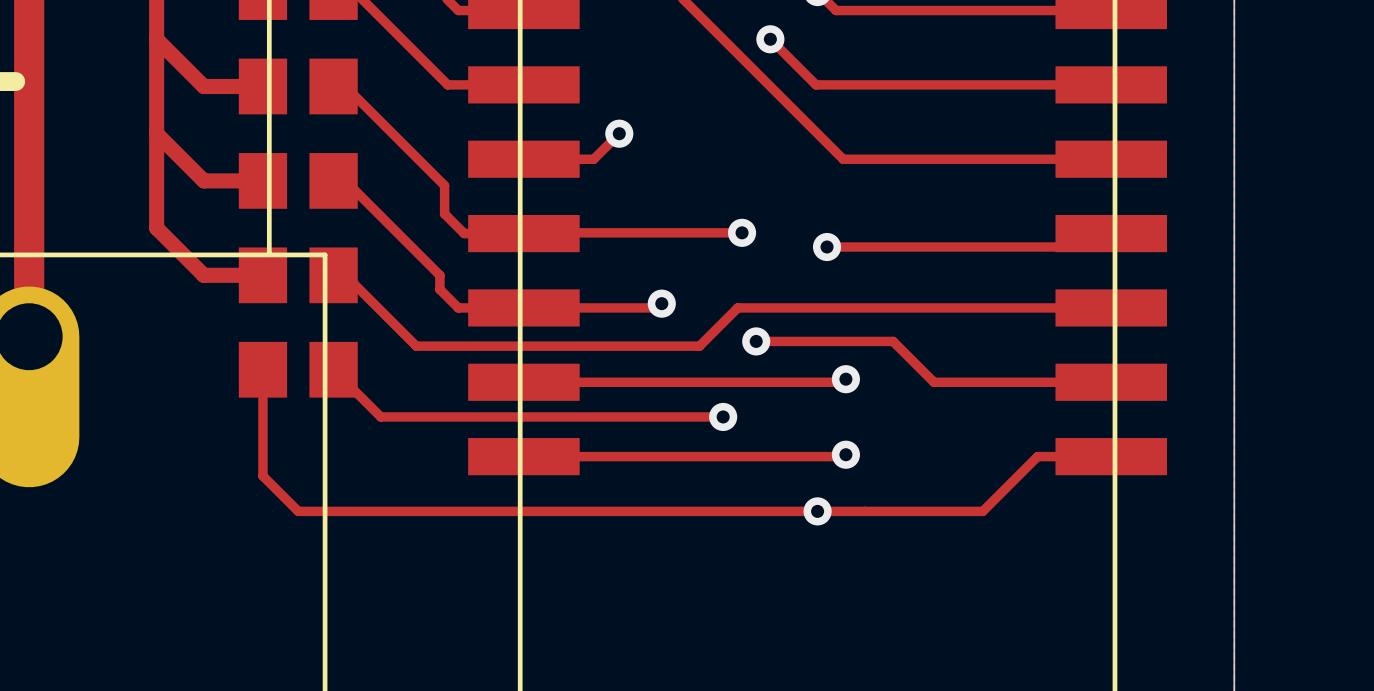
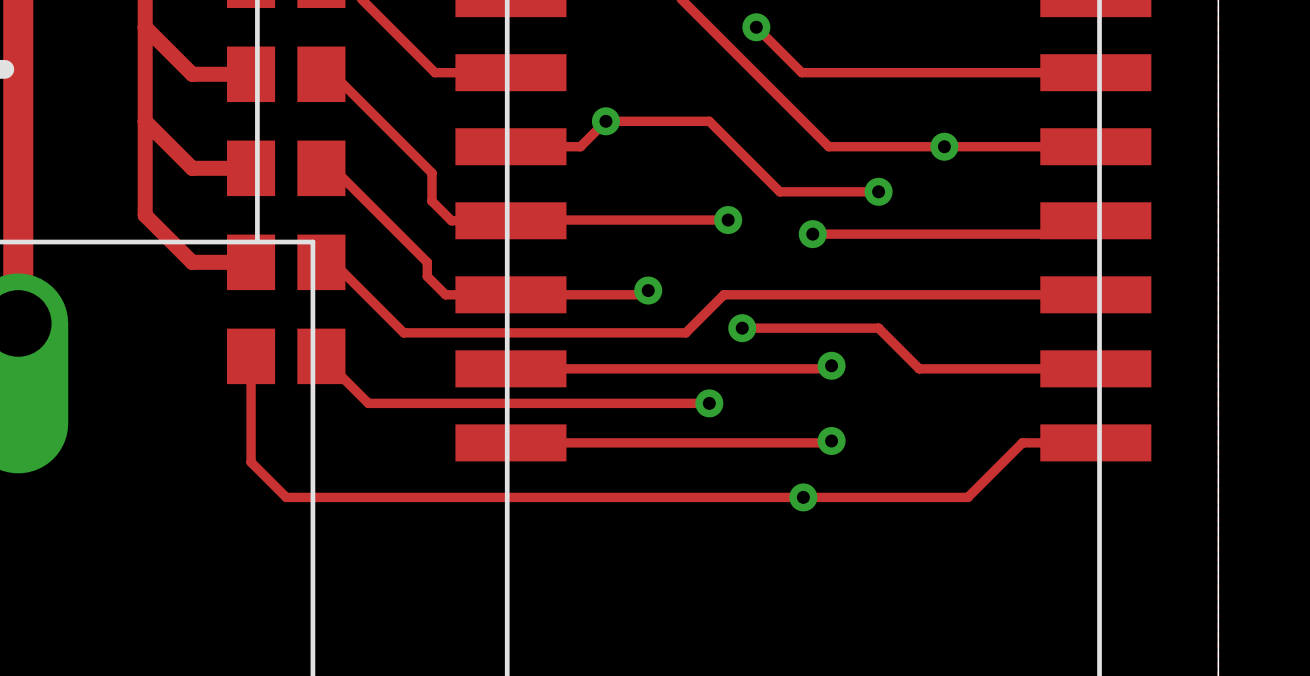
track: none -> (605, 121) (709, 121) (779, 191) (878, 191)
via: none -> (944, 146)
via: none -> (878, 191)

